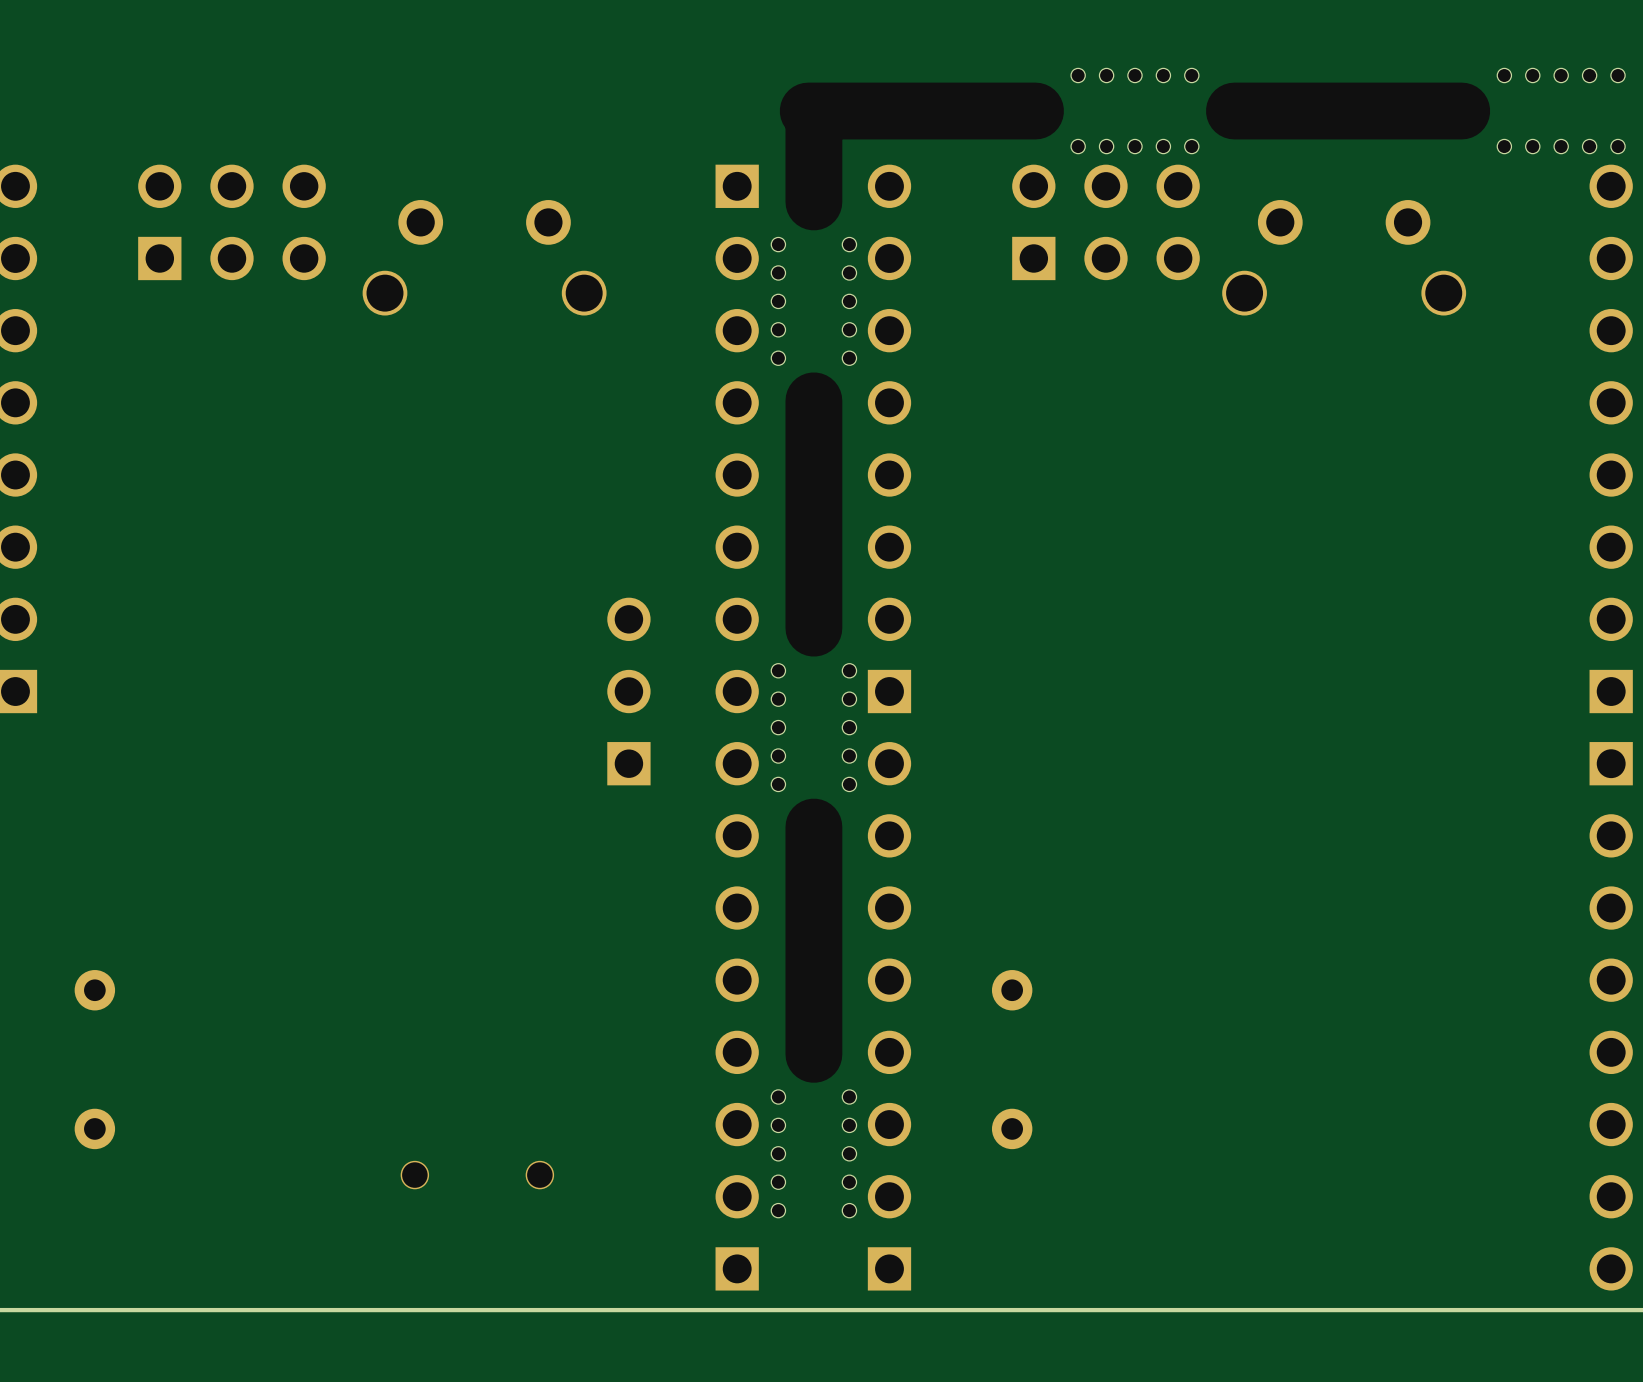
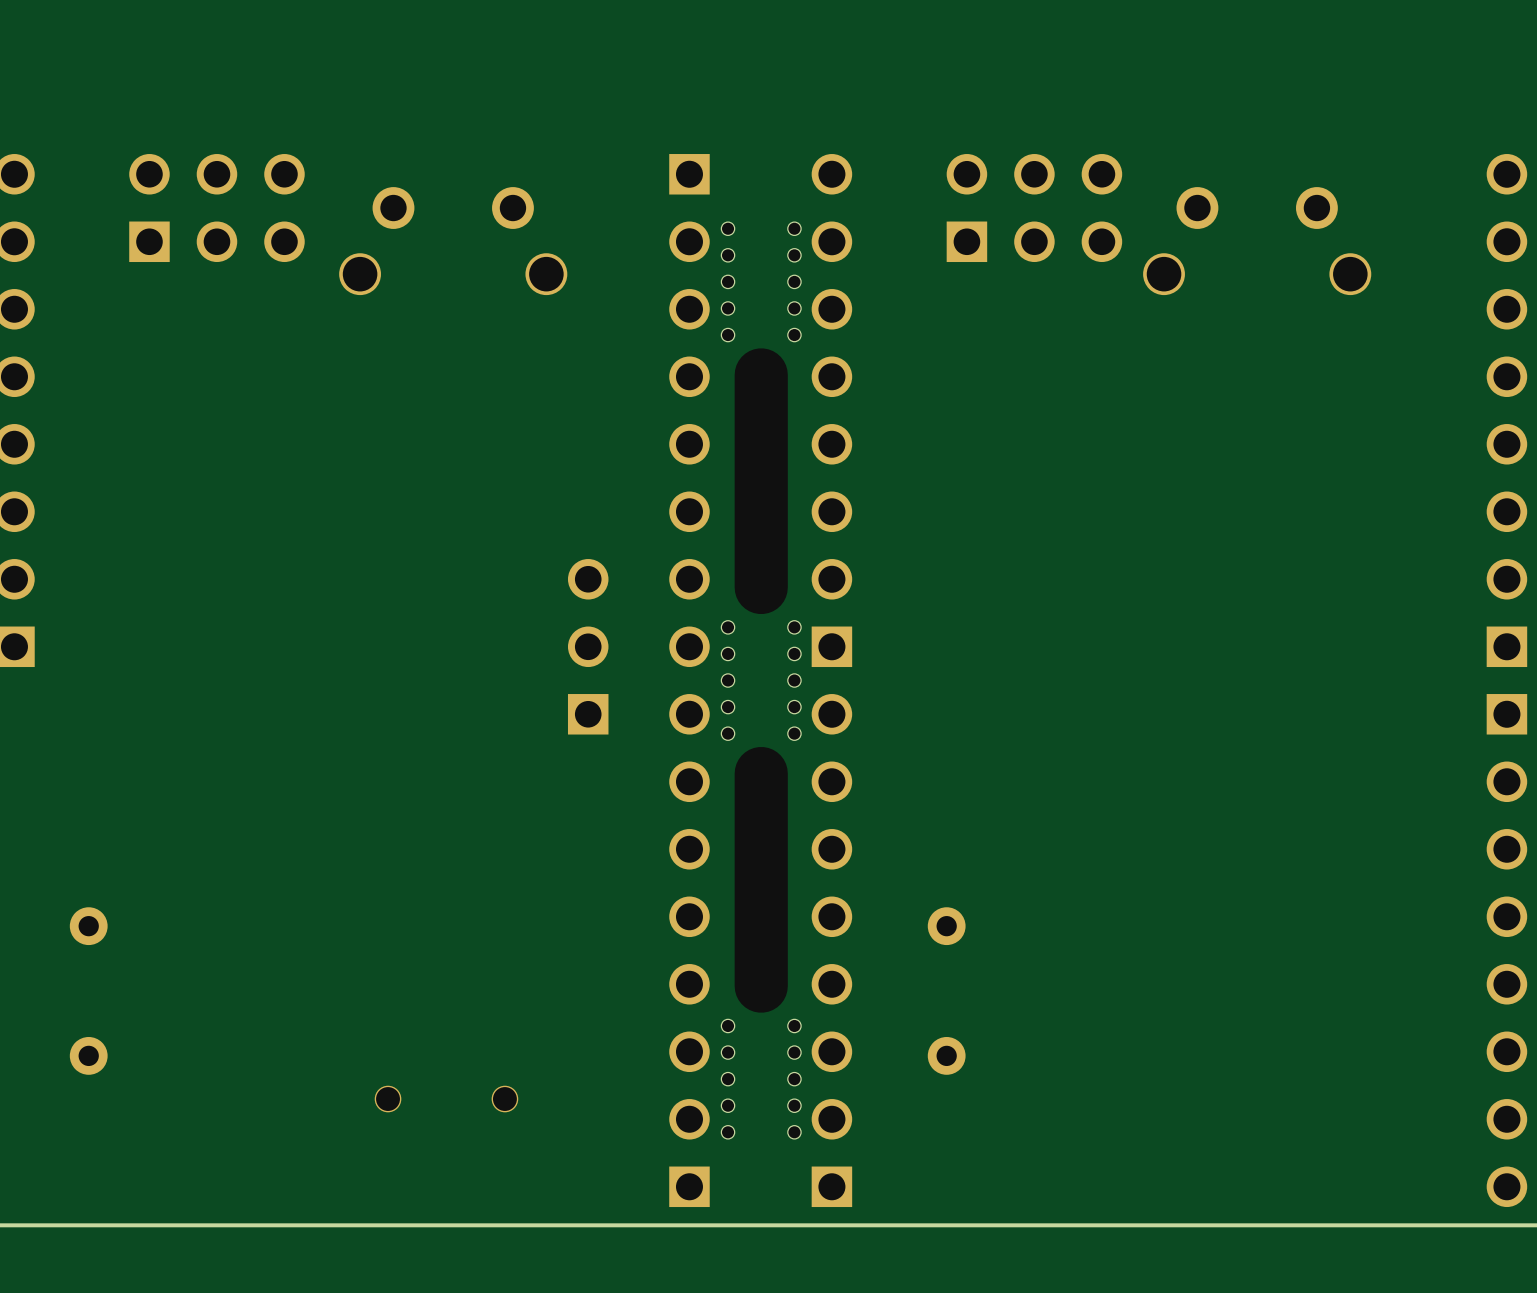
part: (921, 111) -> none
part: (1134, 111) -> none
part: (1348, 111) -> none
part: (1561, 111) -> none
part: (813, 159) -> none

